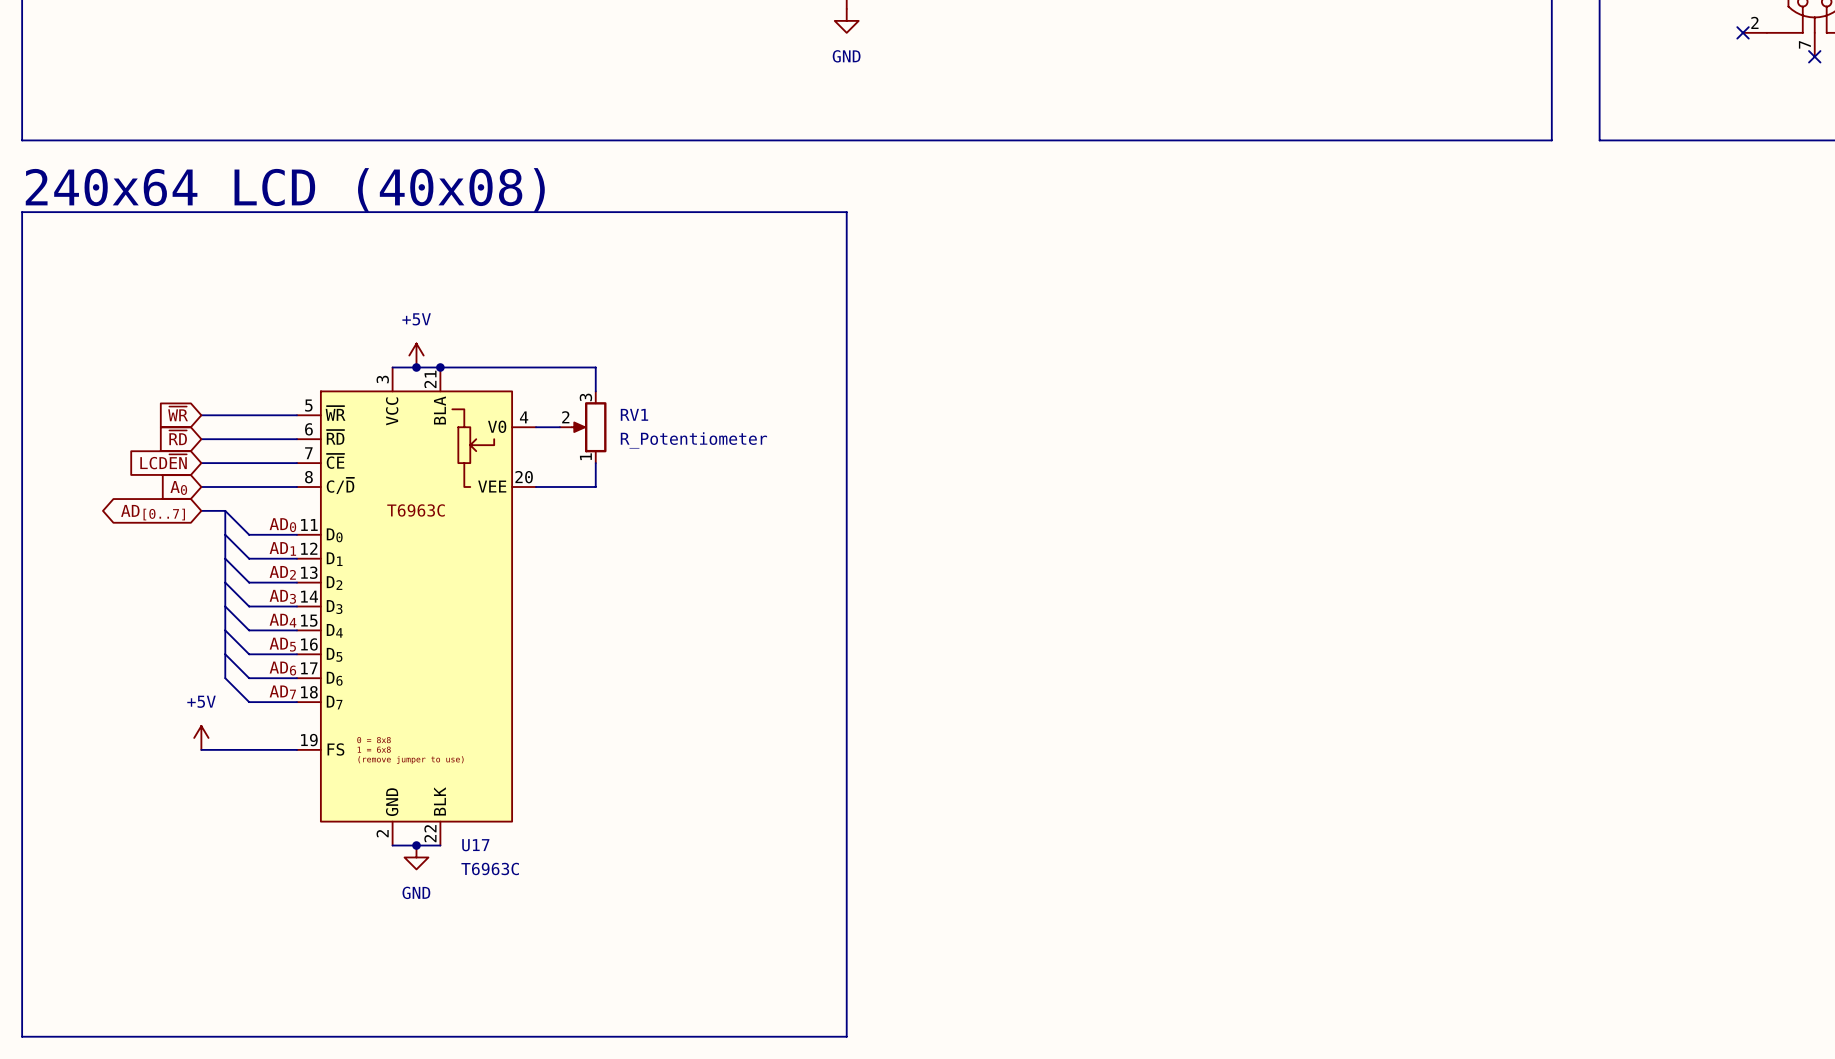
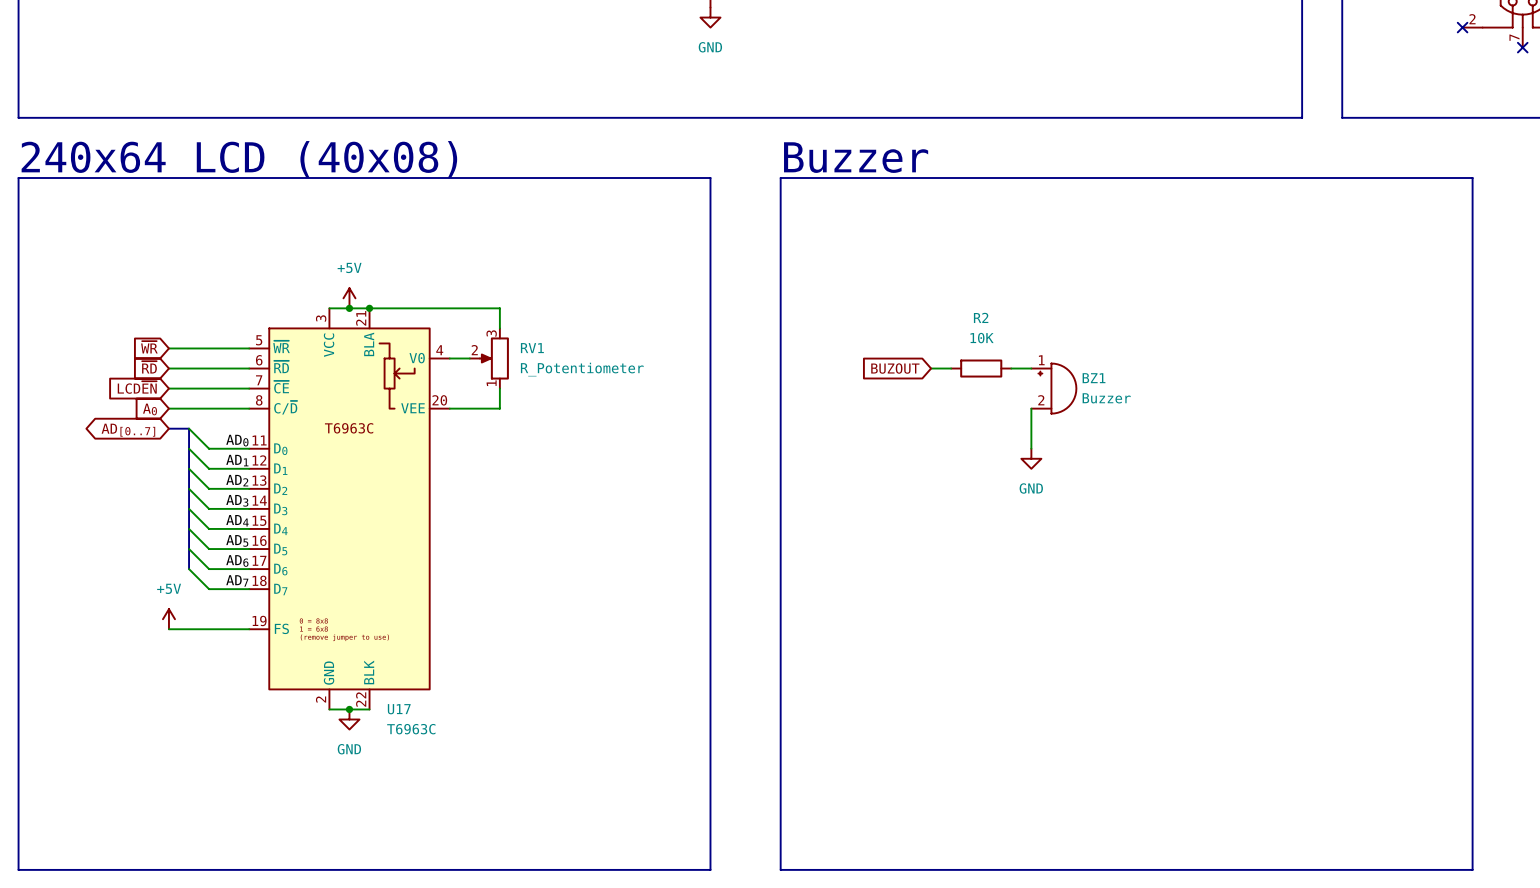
text: none -> Buzzer (856, 157)
line: none -> (780, 177) (1472, 177) (1472, 869) (780, 869) (780, 177)
global label: none -> BUZOUT (895, 368)
wire: none -> (931, 368) (951, 368)
R2: none -> 10K (981, 368)
wire: none -> (1011, 368) (1031, 368)
BZ1: none -> Buzzer (1053, 388)
wire: none -> (1031, 408) (1031, 448)
power symbol: none -> GND (1031, 458)

